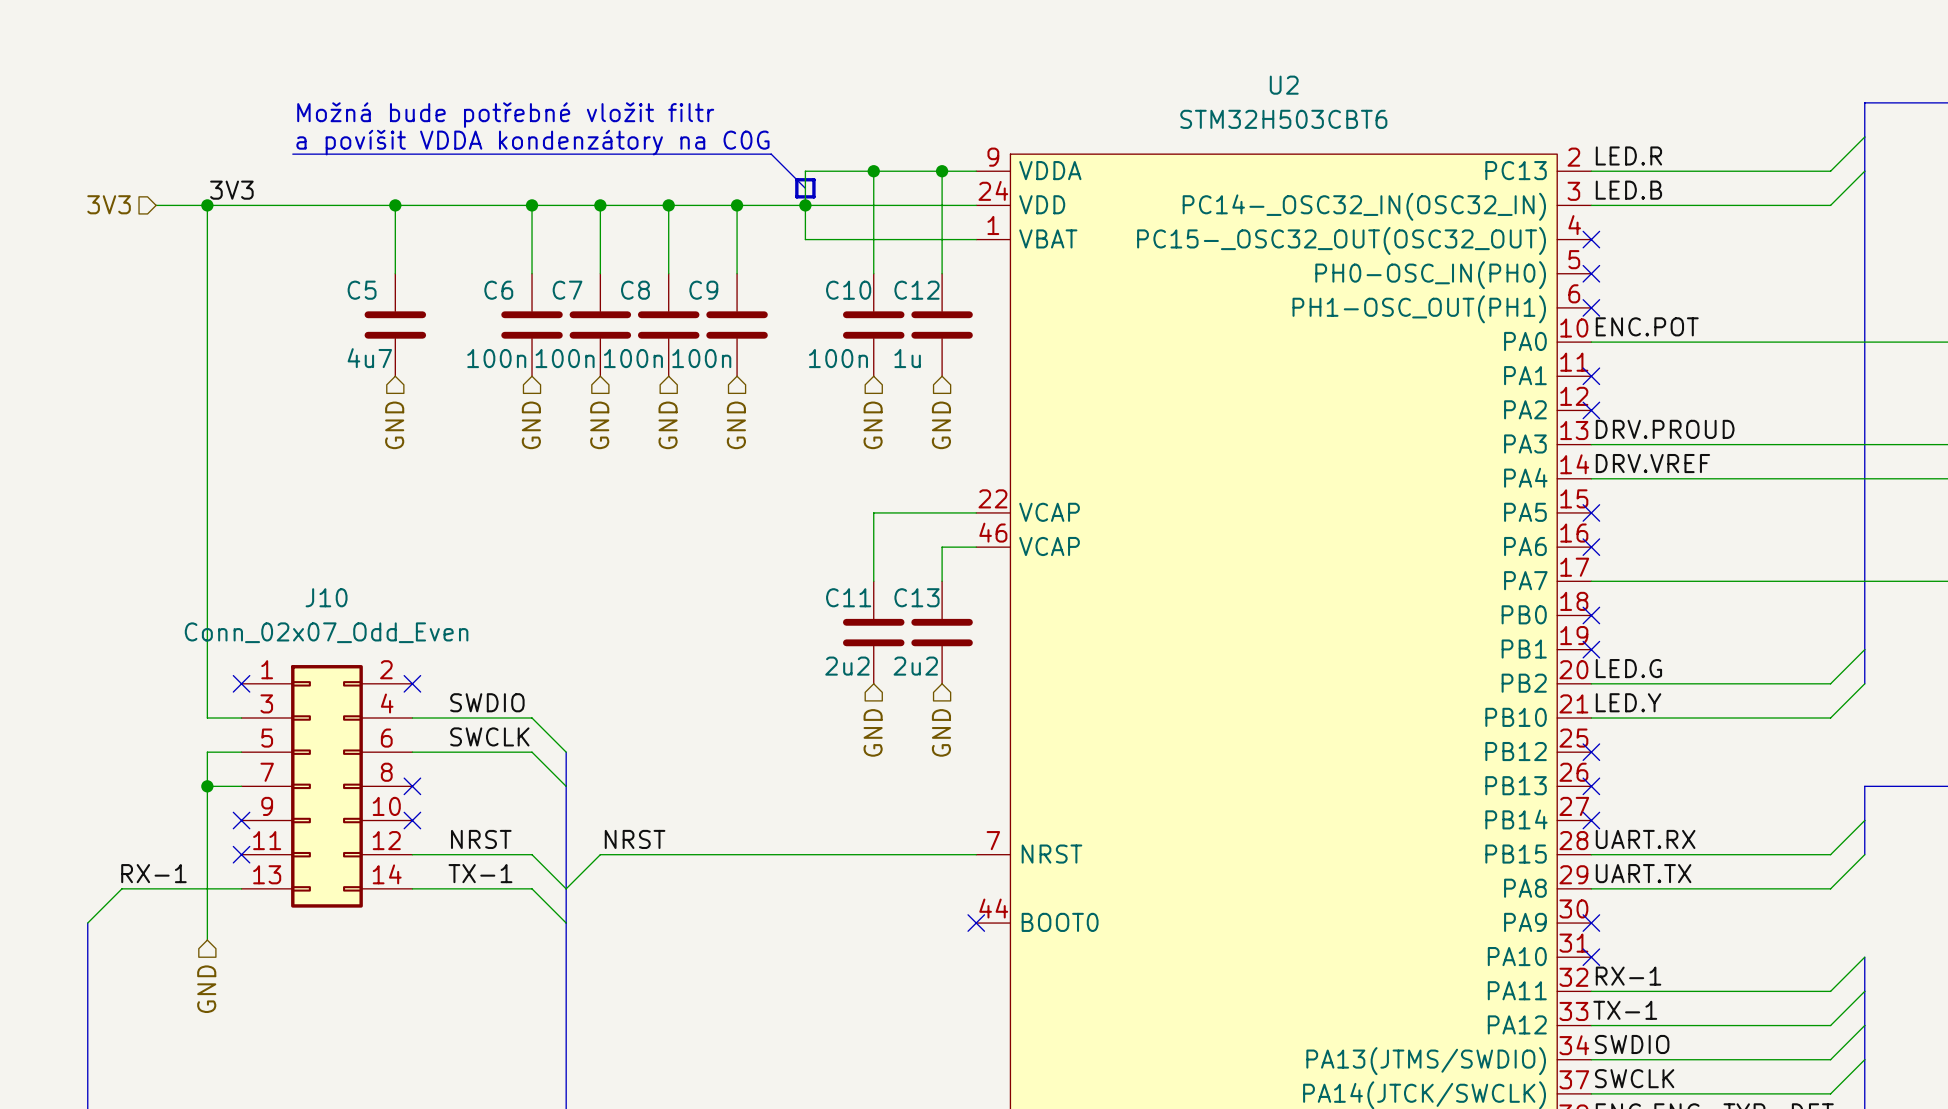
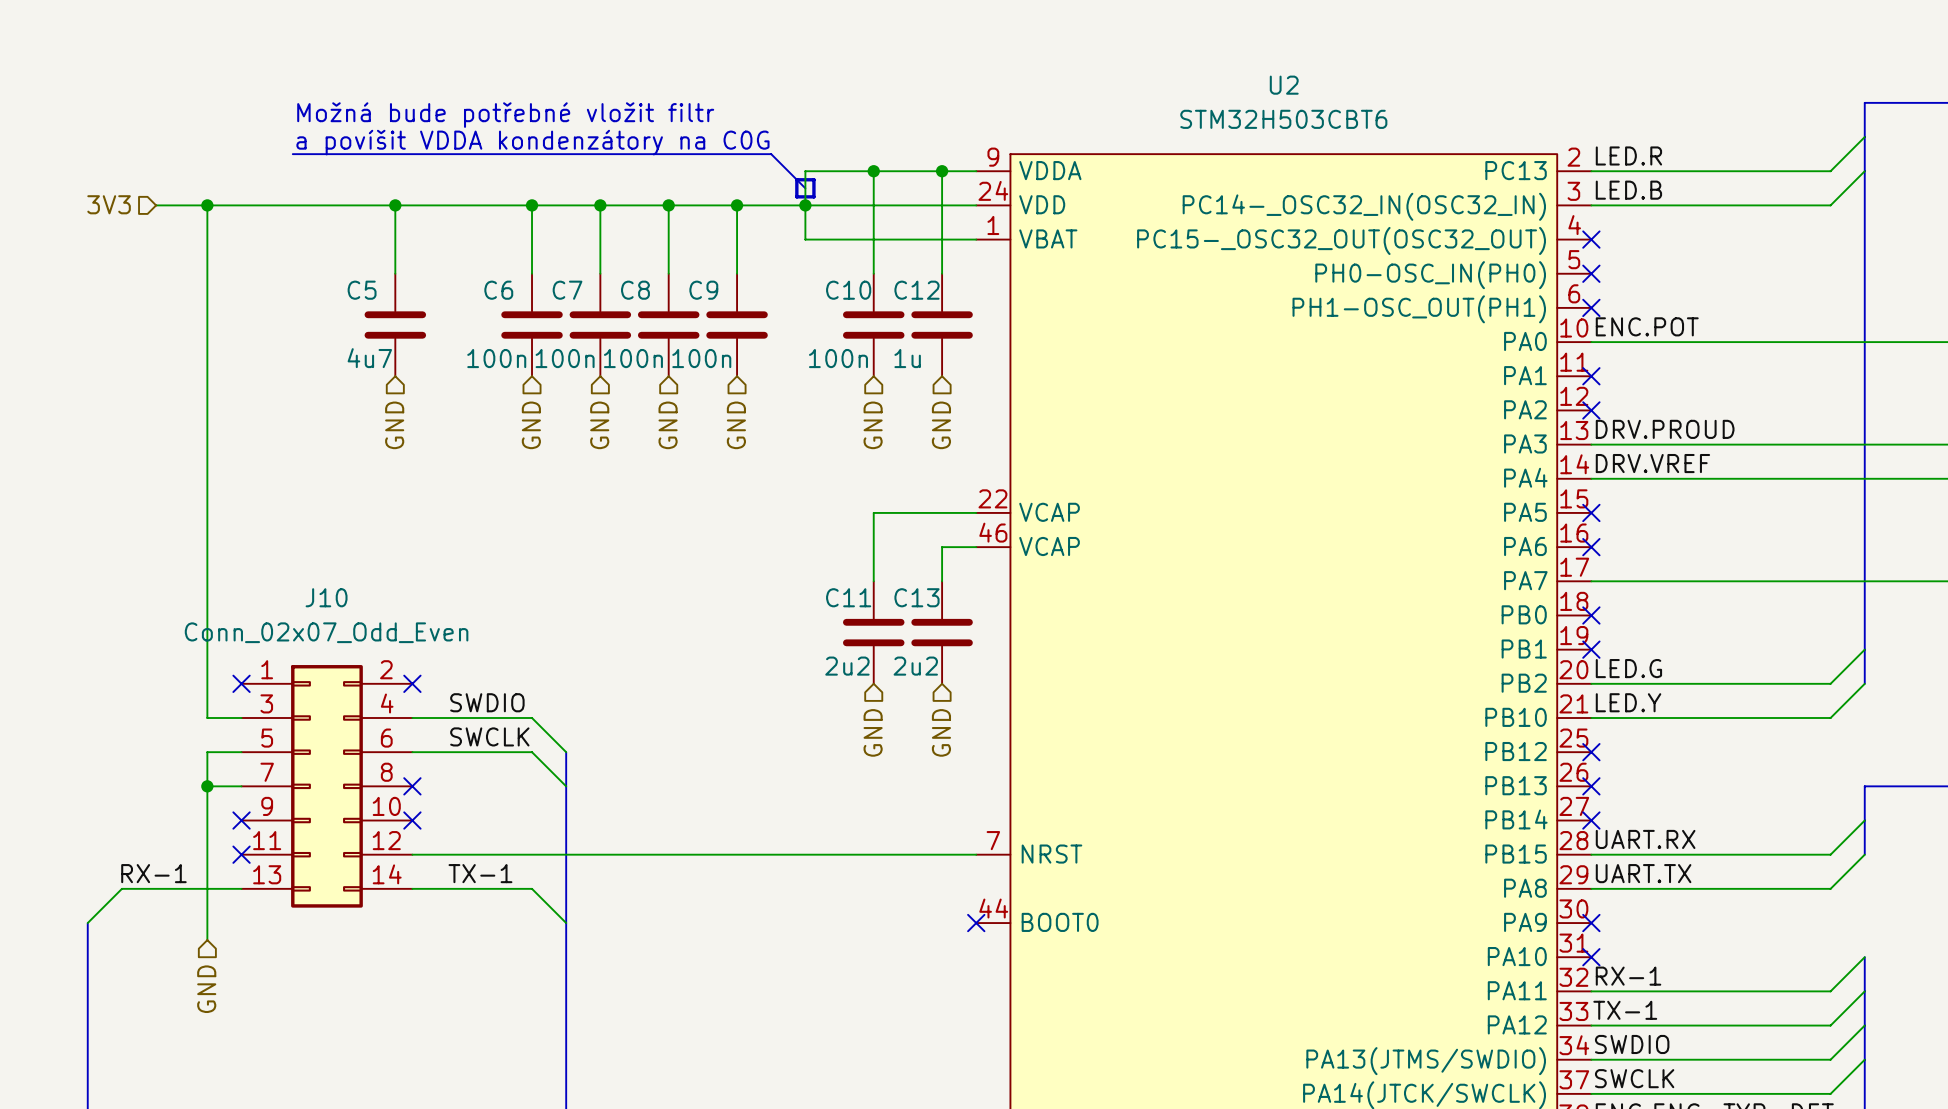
label: 3V3 (231, 190) -> none
label: NRST (481, 839) -> none
label: NRST (635, 839) -> none
wire: (532, 854) (566, 888) (600, 854) -> (532, 854) (600, 854)

